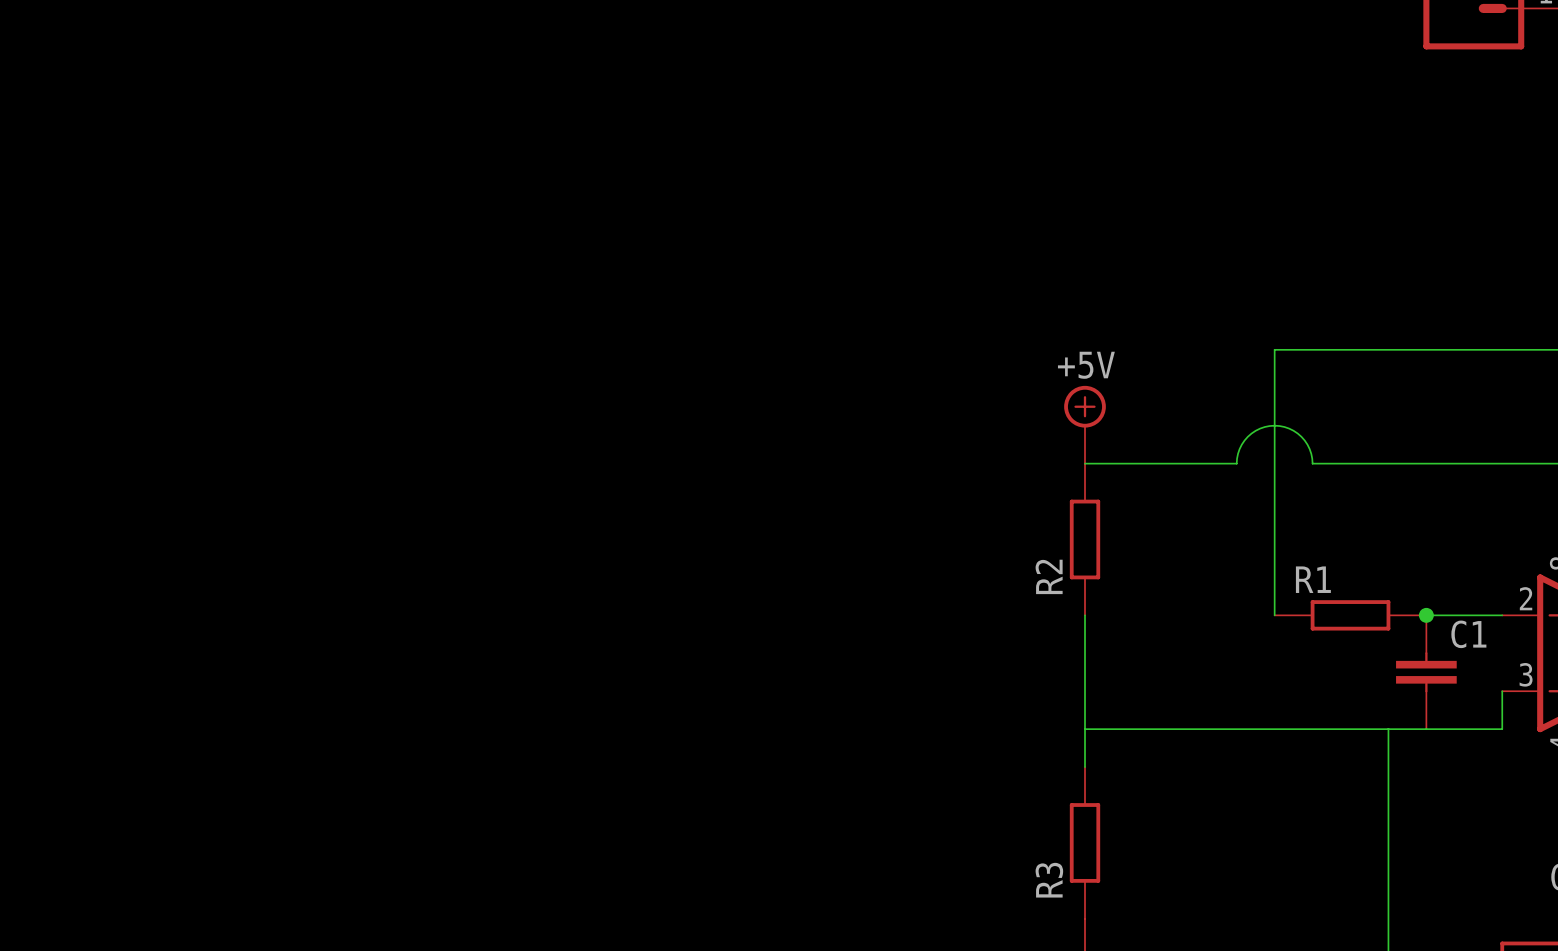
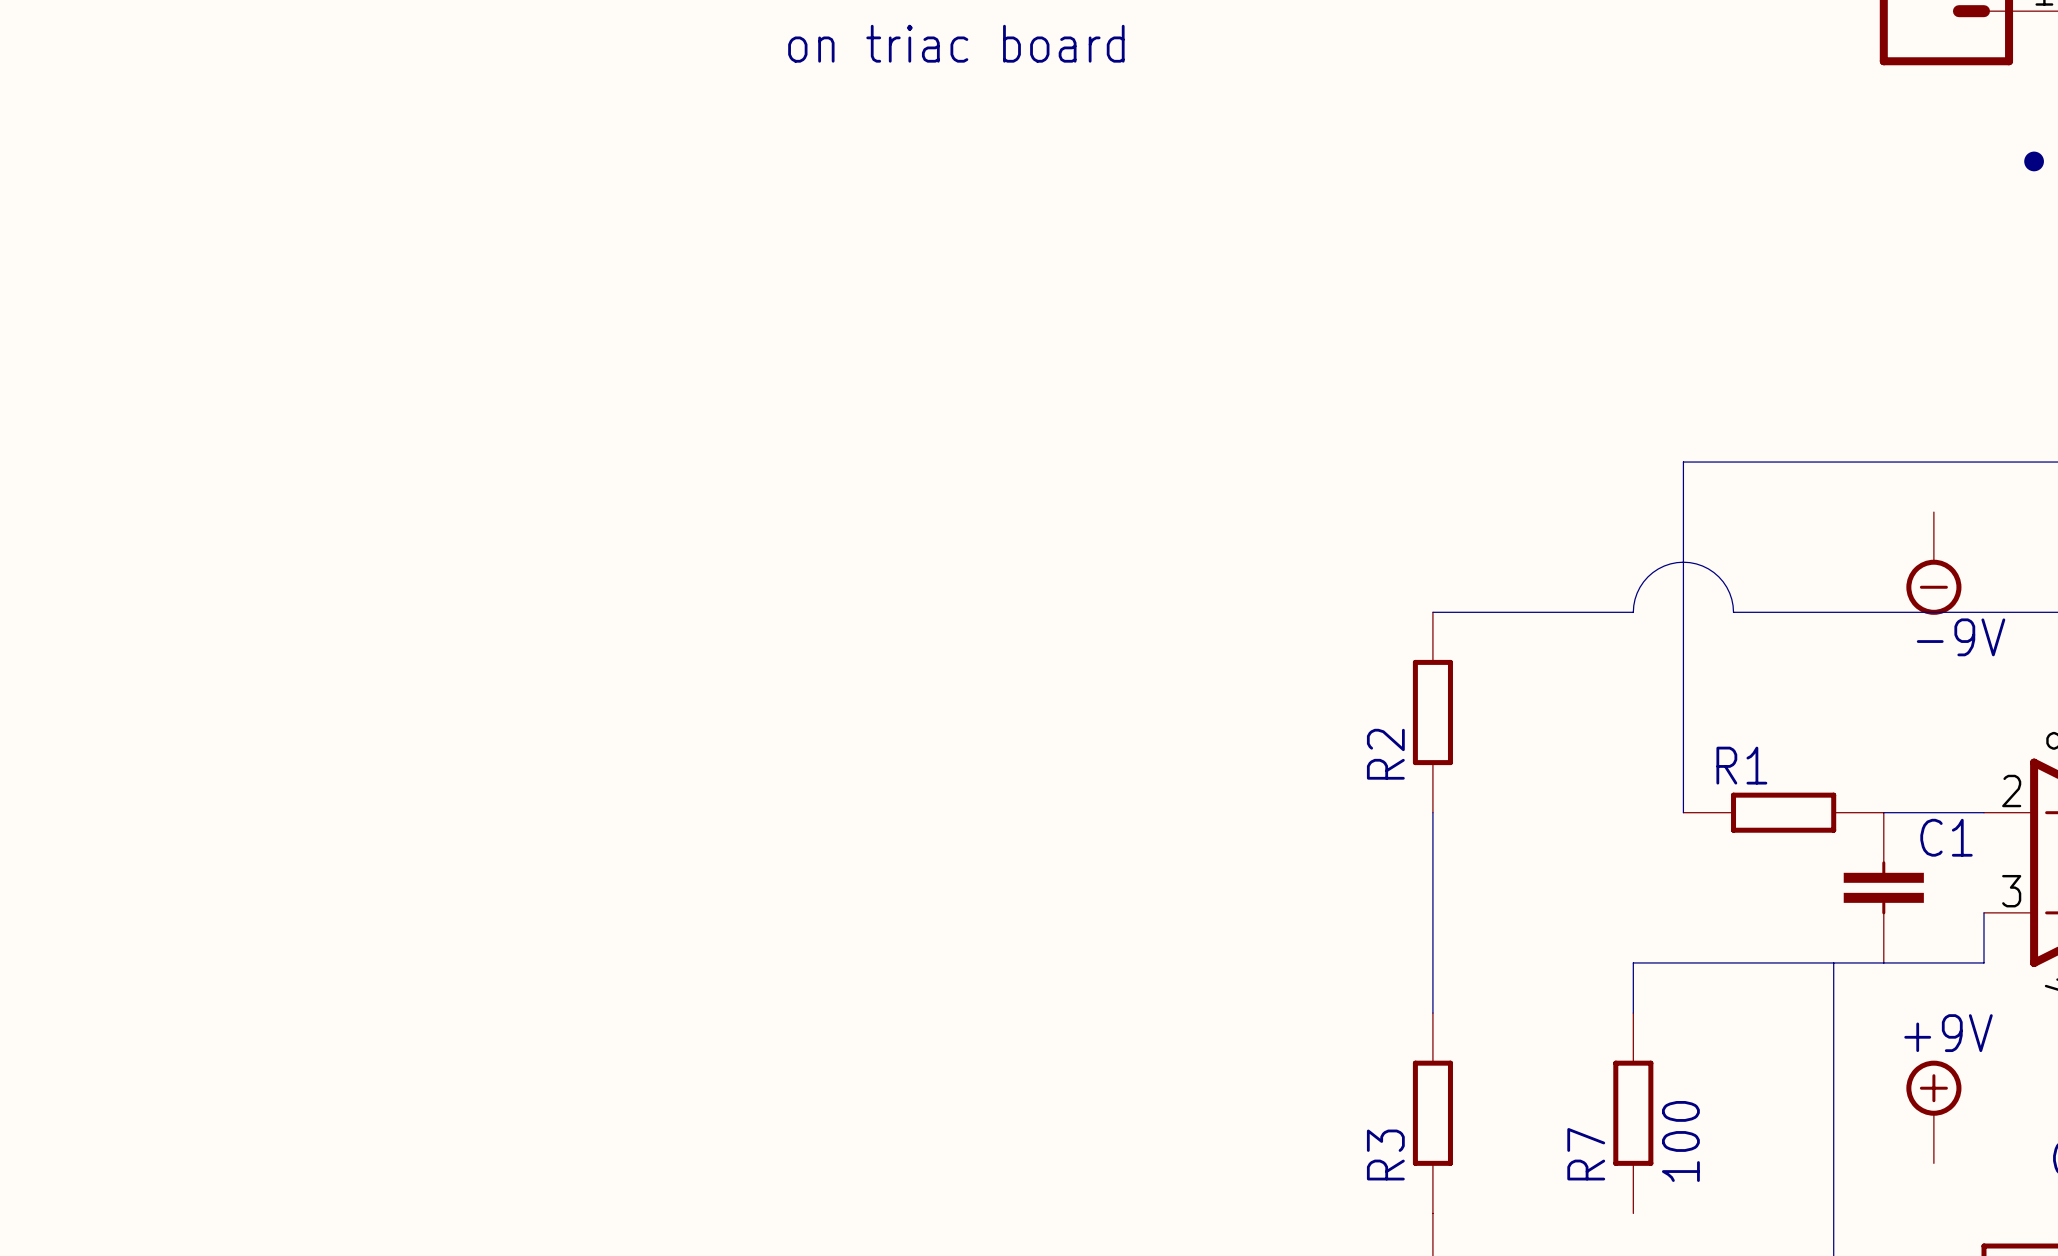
text: none -> on triac board (956, 43)
junction: none -> (2034, 161)
power symbol: +5V (1085, 424) -> none
power symbol: none -> -9V (1933, 563)
junction: (1426, 615) -> none
wire: (1085, 729) (1236, 729) -> (1633, 1013) (1633, 962)
power symbol: none -> +9V (1933, 1112)
R7: none -> 100 (1633, 1113)

